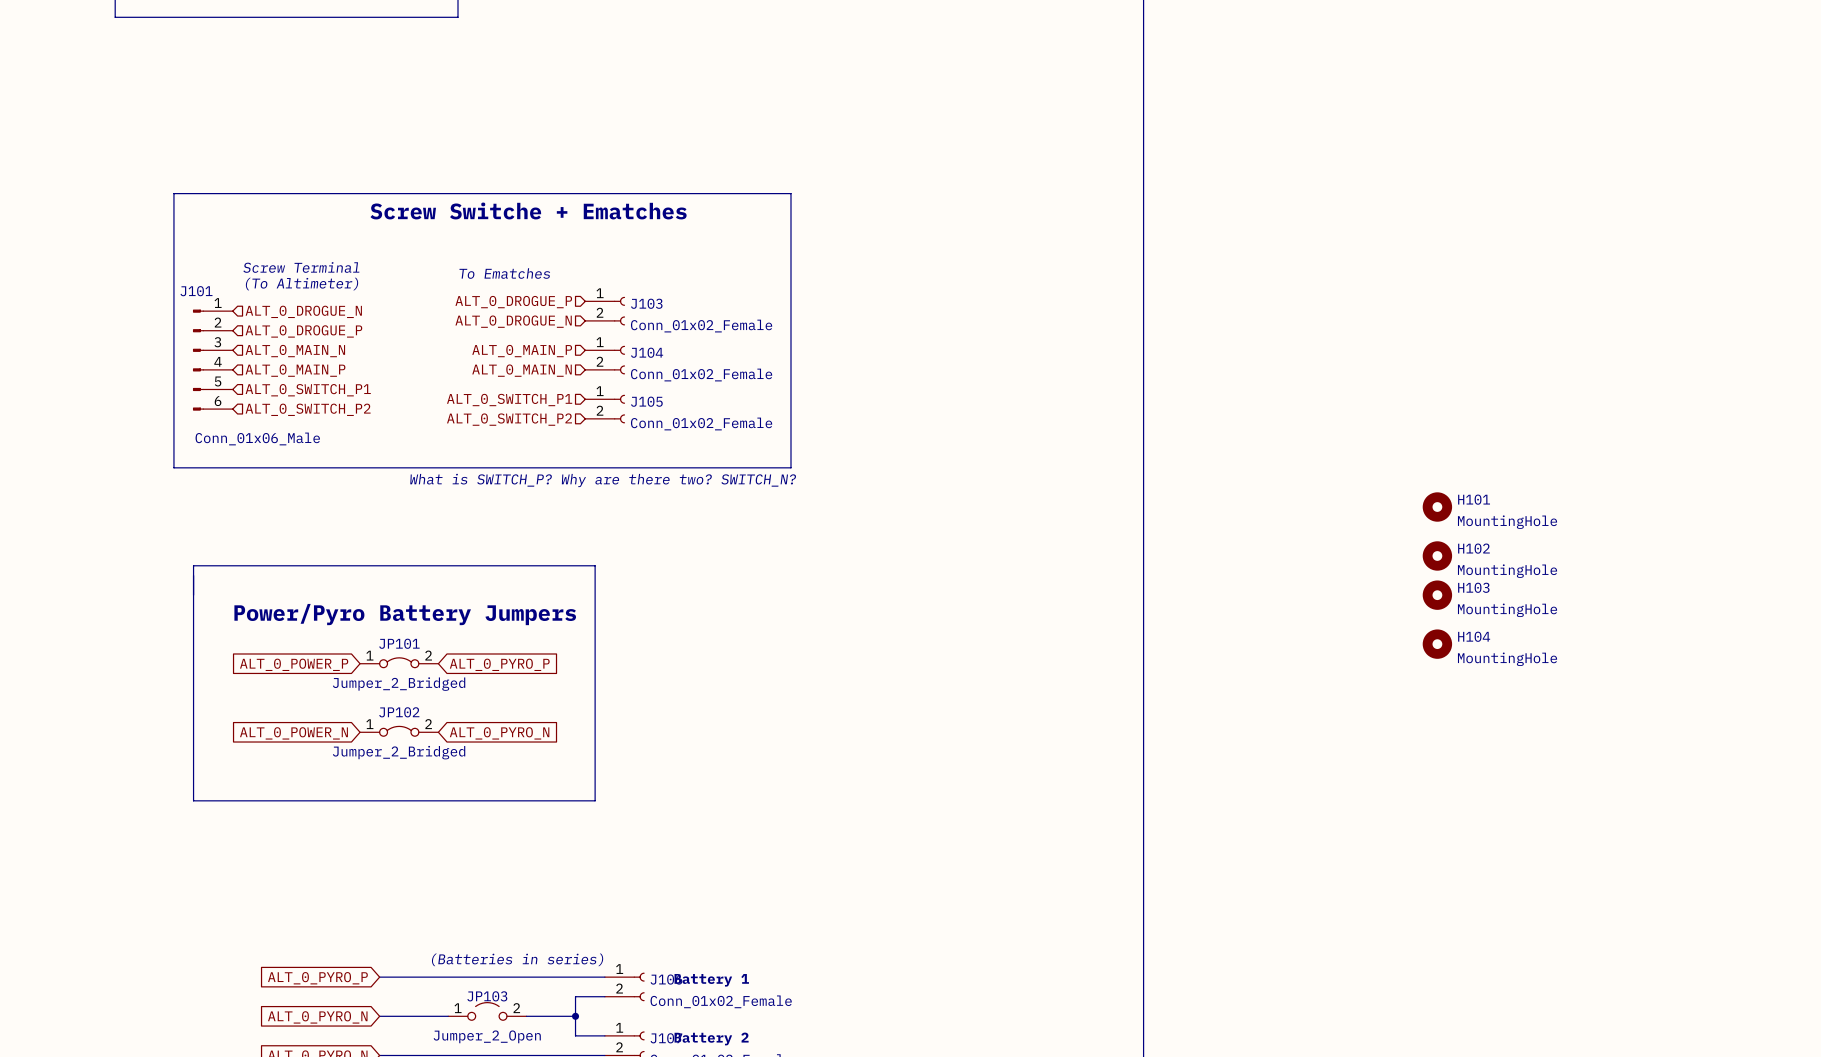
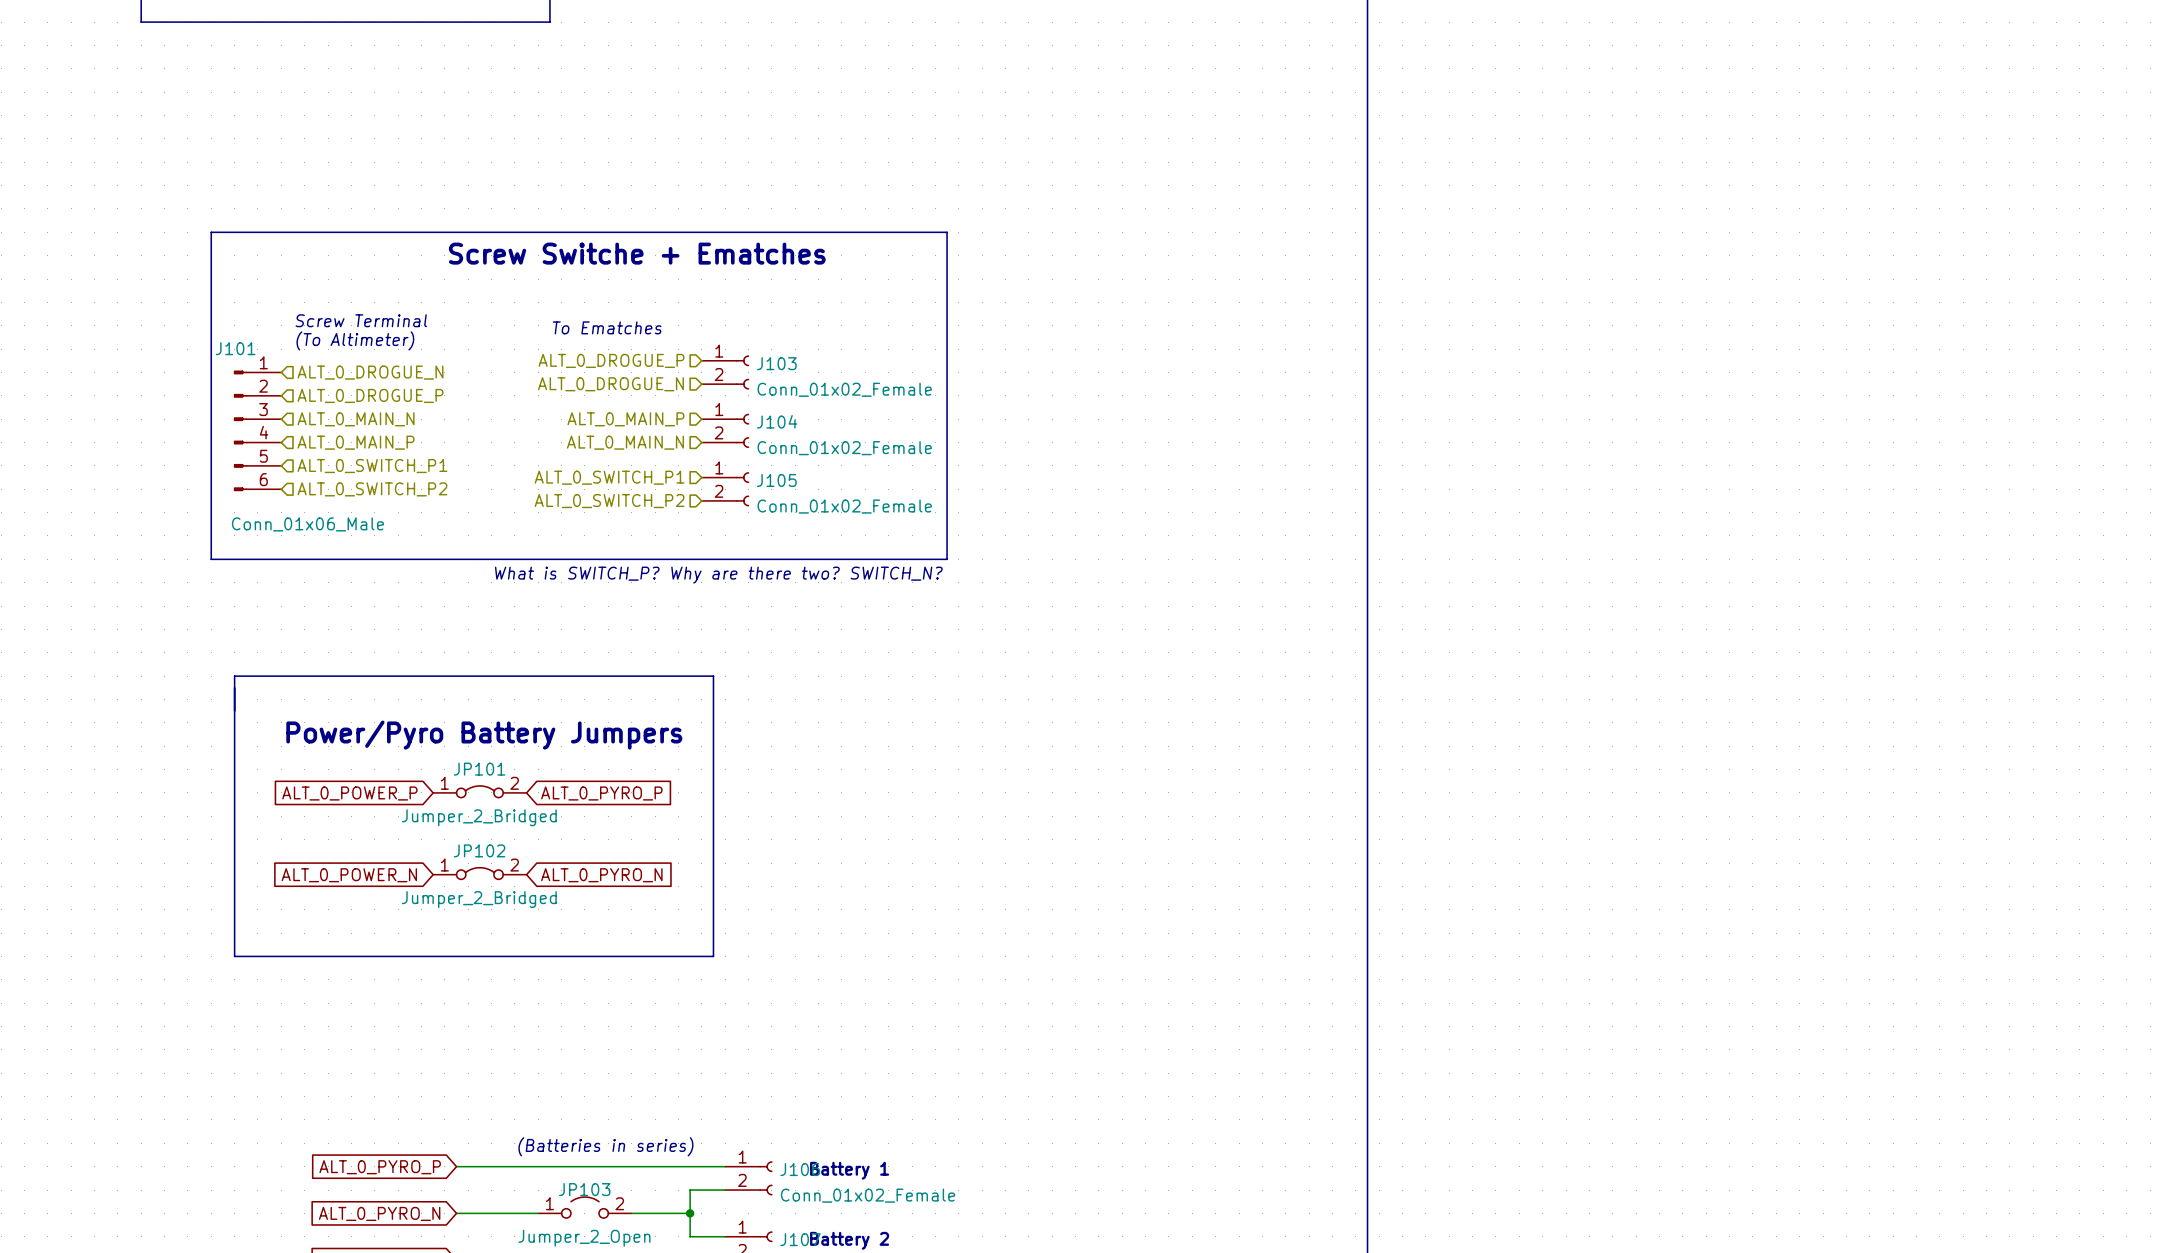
H101: MountingHole (1437, 507) -> none
H102: MountingHole (1437, 555) -> none
H103: MountingHole (1437, 595) -> none
H104: MountingHole (1437, 644) -> none

